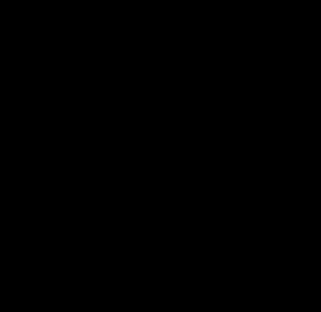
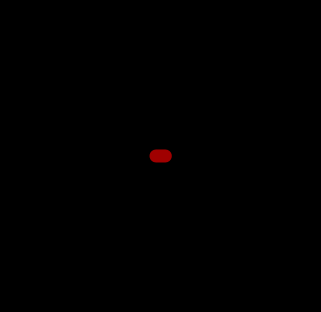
top track: none -> (155, 155) (165, 155)

